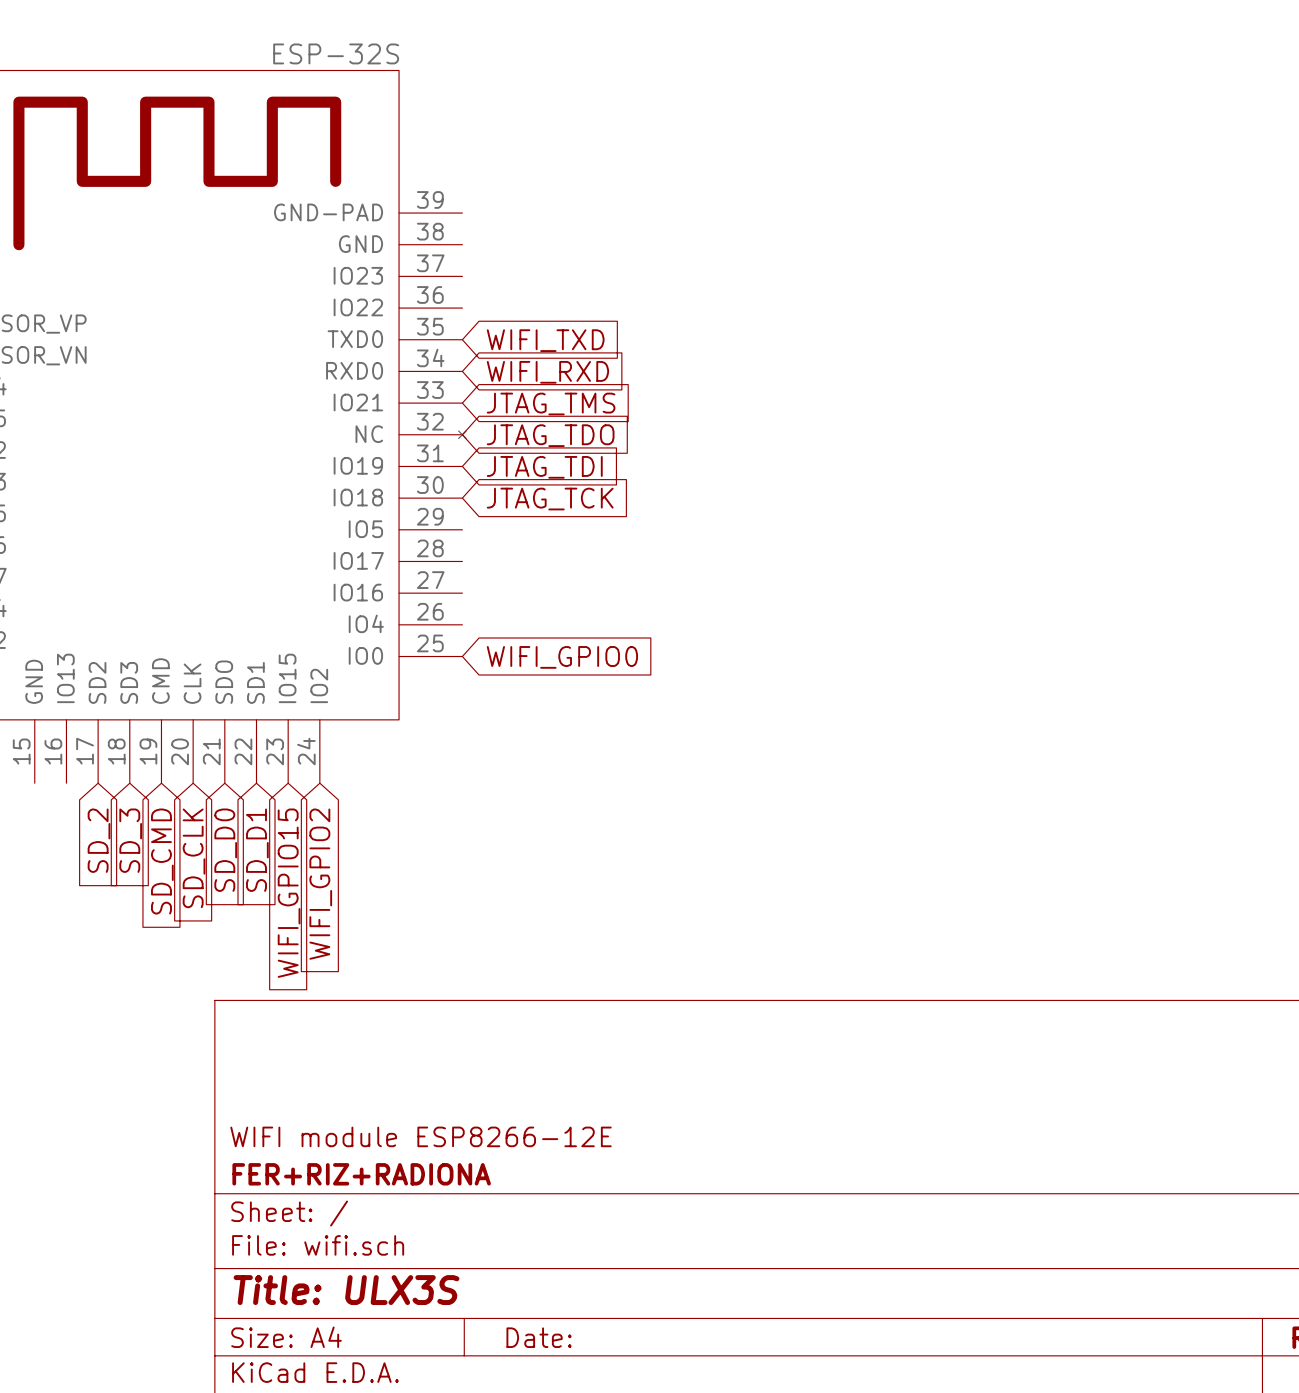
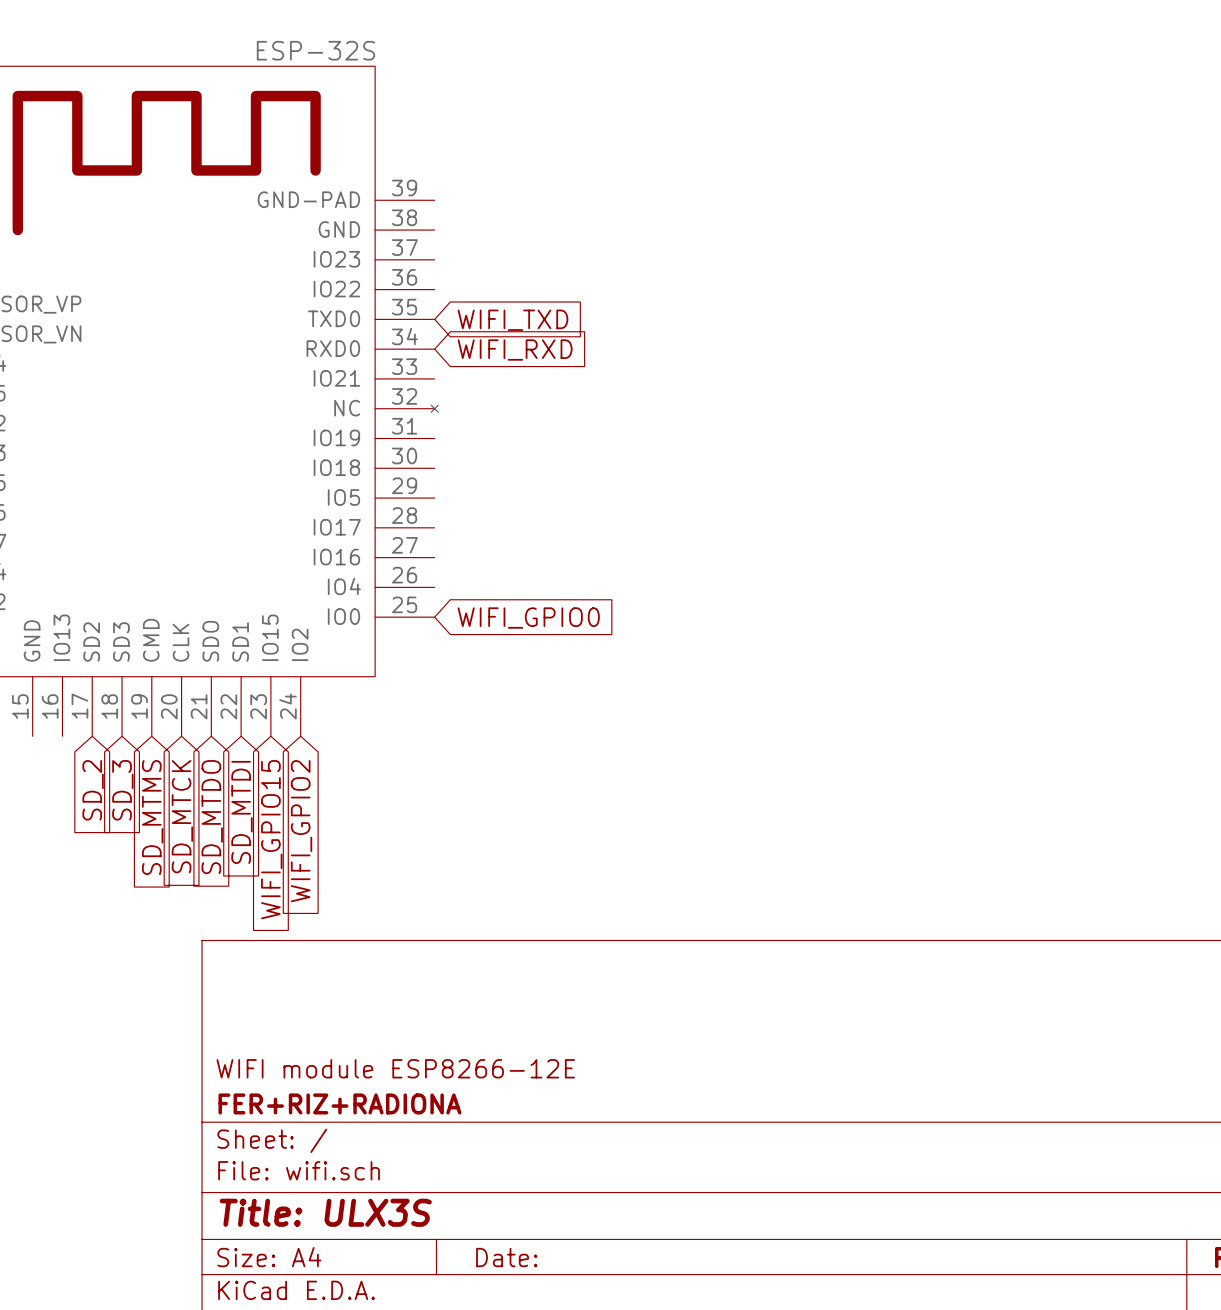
global label: JTAG_TMS (551, 403) -> none
global label: JTAG_TDO (550, 435) -> none
global label: JTAG_TDI (544, 467) -> none
global label: JTAG_TCK (550, 499) -> none
global label: SD_D0 (225, 850) -> SD_MTDO (212, 817)
global label: SD_D1 (257, 850) -> SD_MTDI (241, 812)
global label: SD_CLK (194, 858) -> SD_MTCK (182, 816)
global label: SD_CMD (162, 861) -> SD_MTMS (152, 817)

